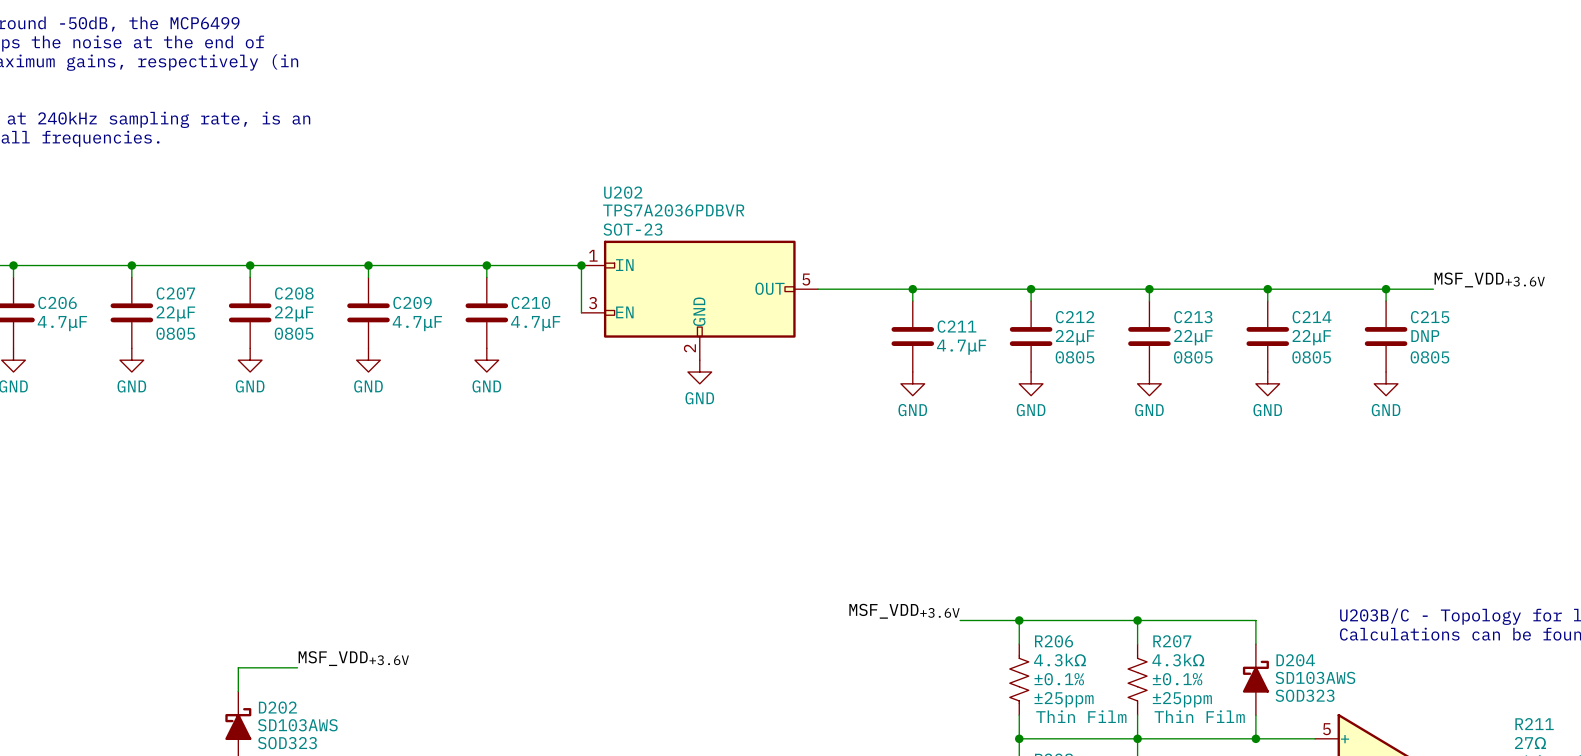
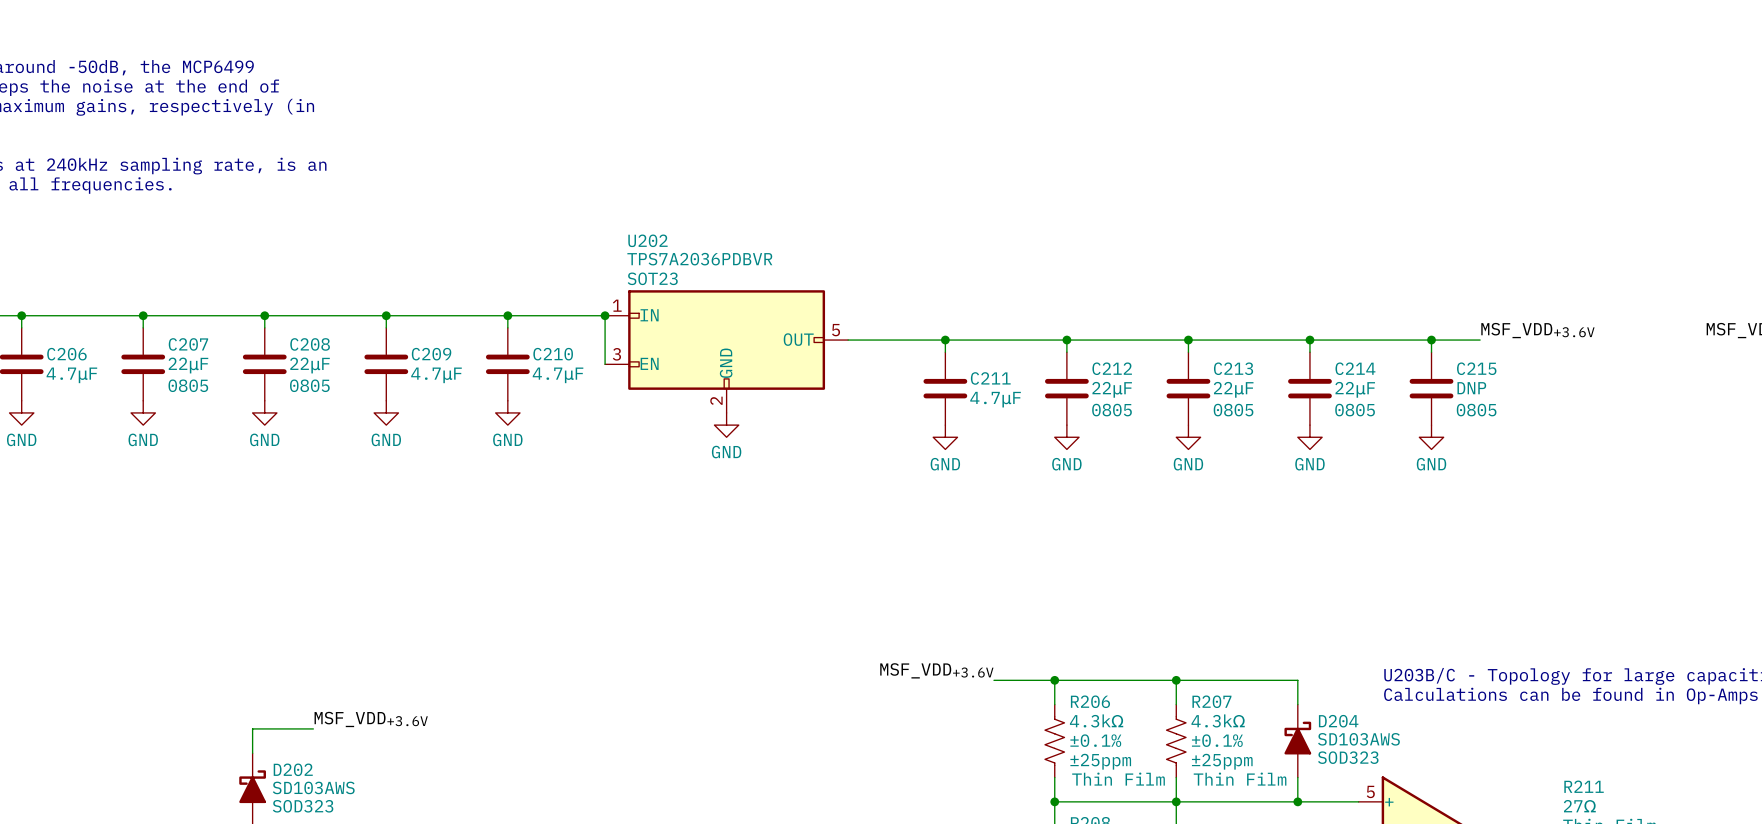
U202 text: SOT-23 (632, 229) -> SOT23 (652, 278)

